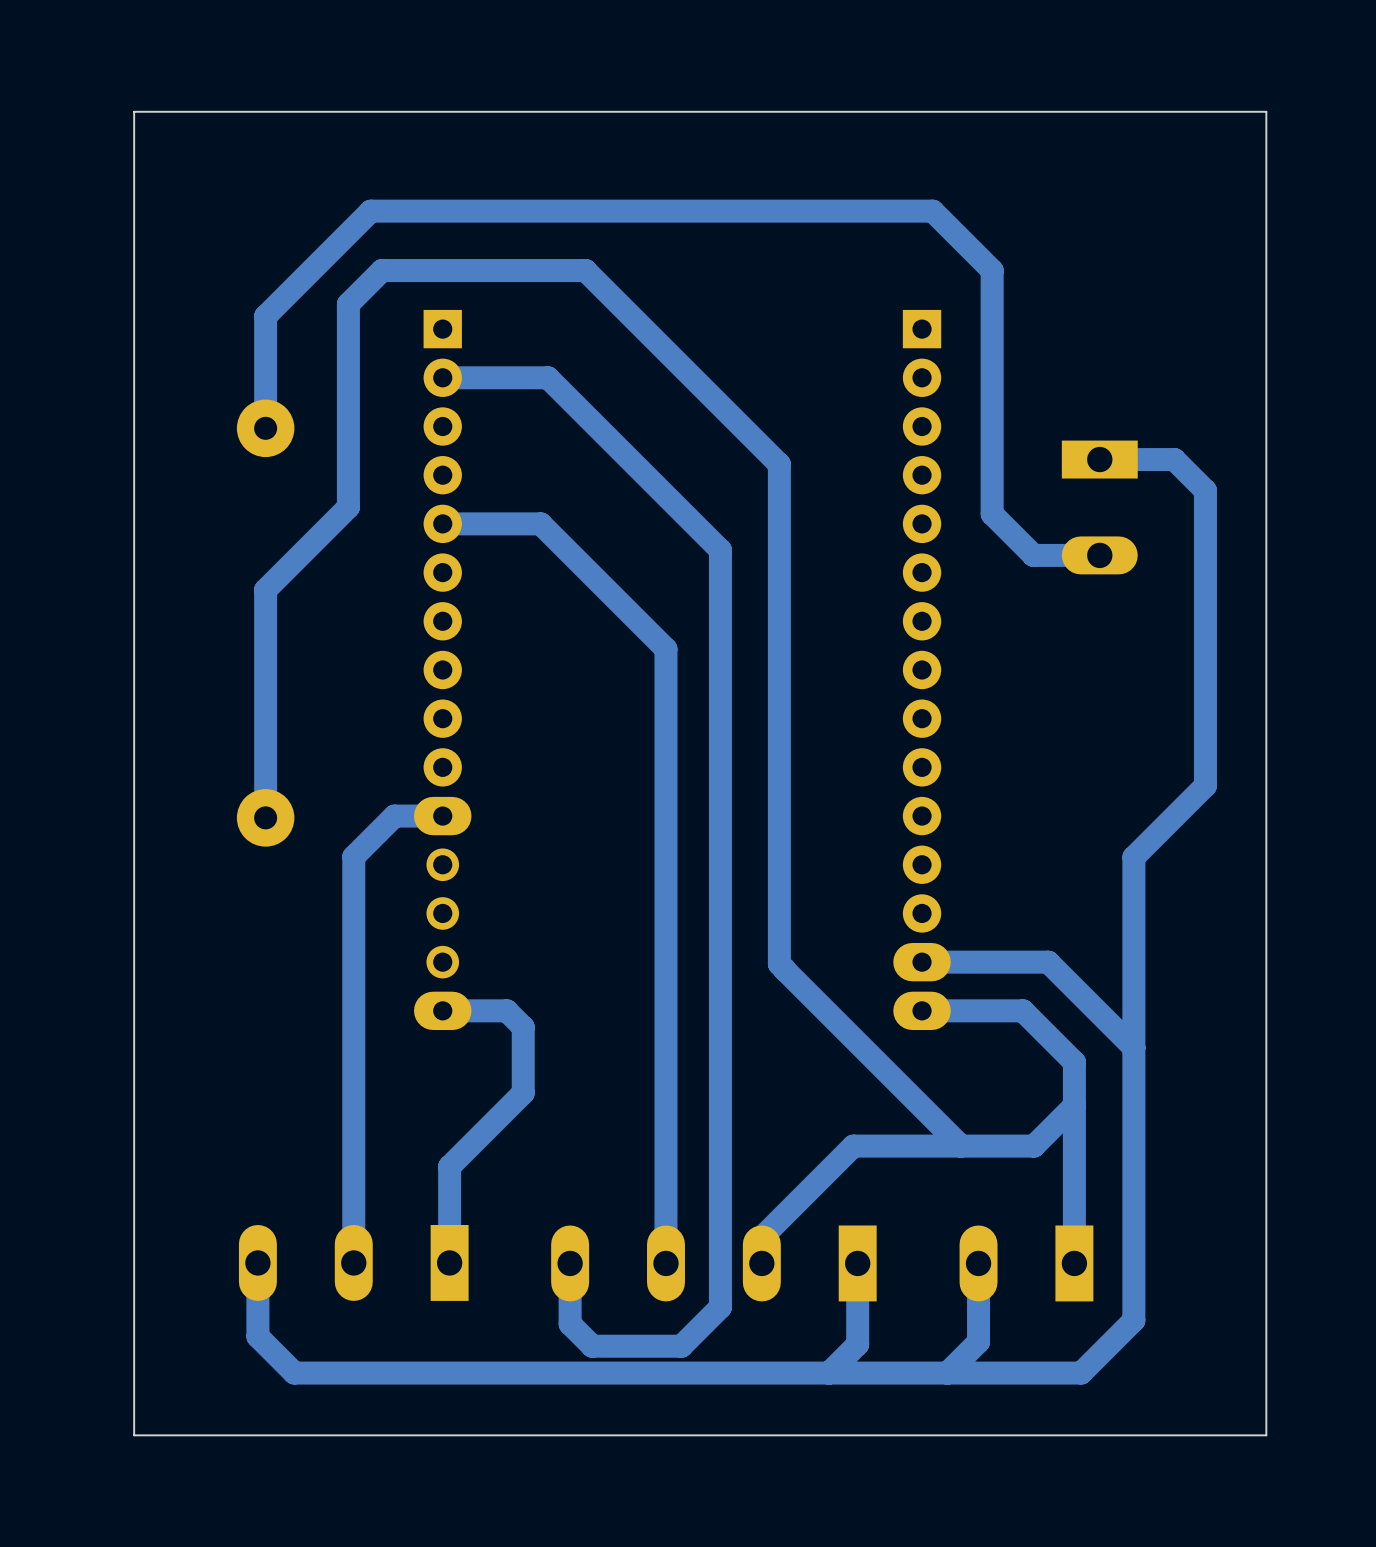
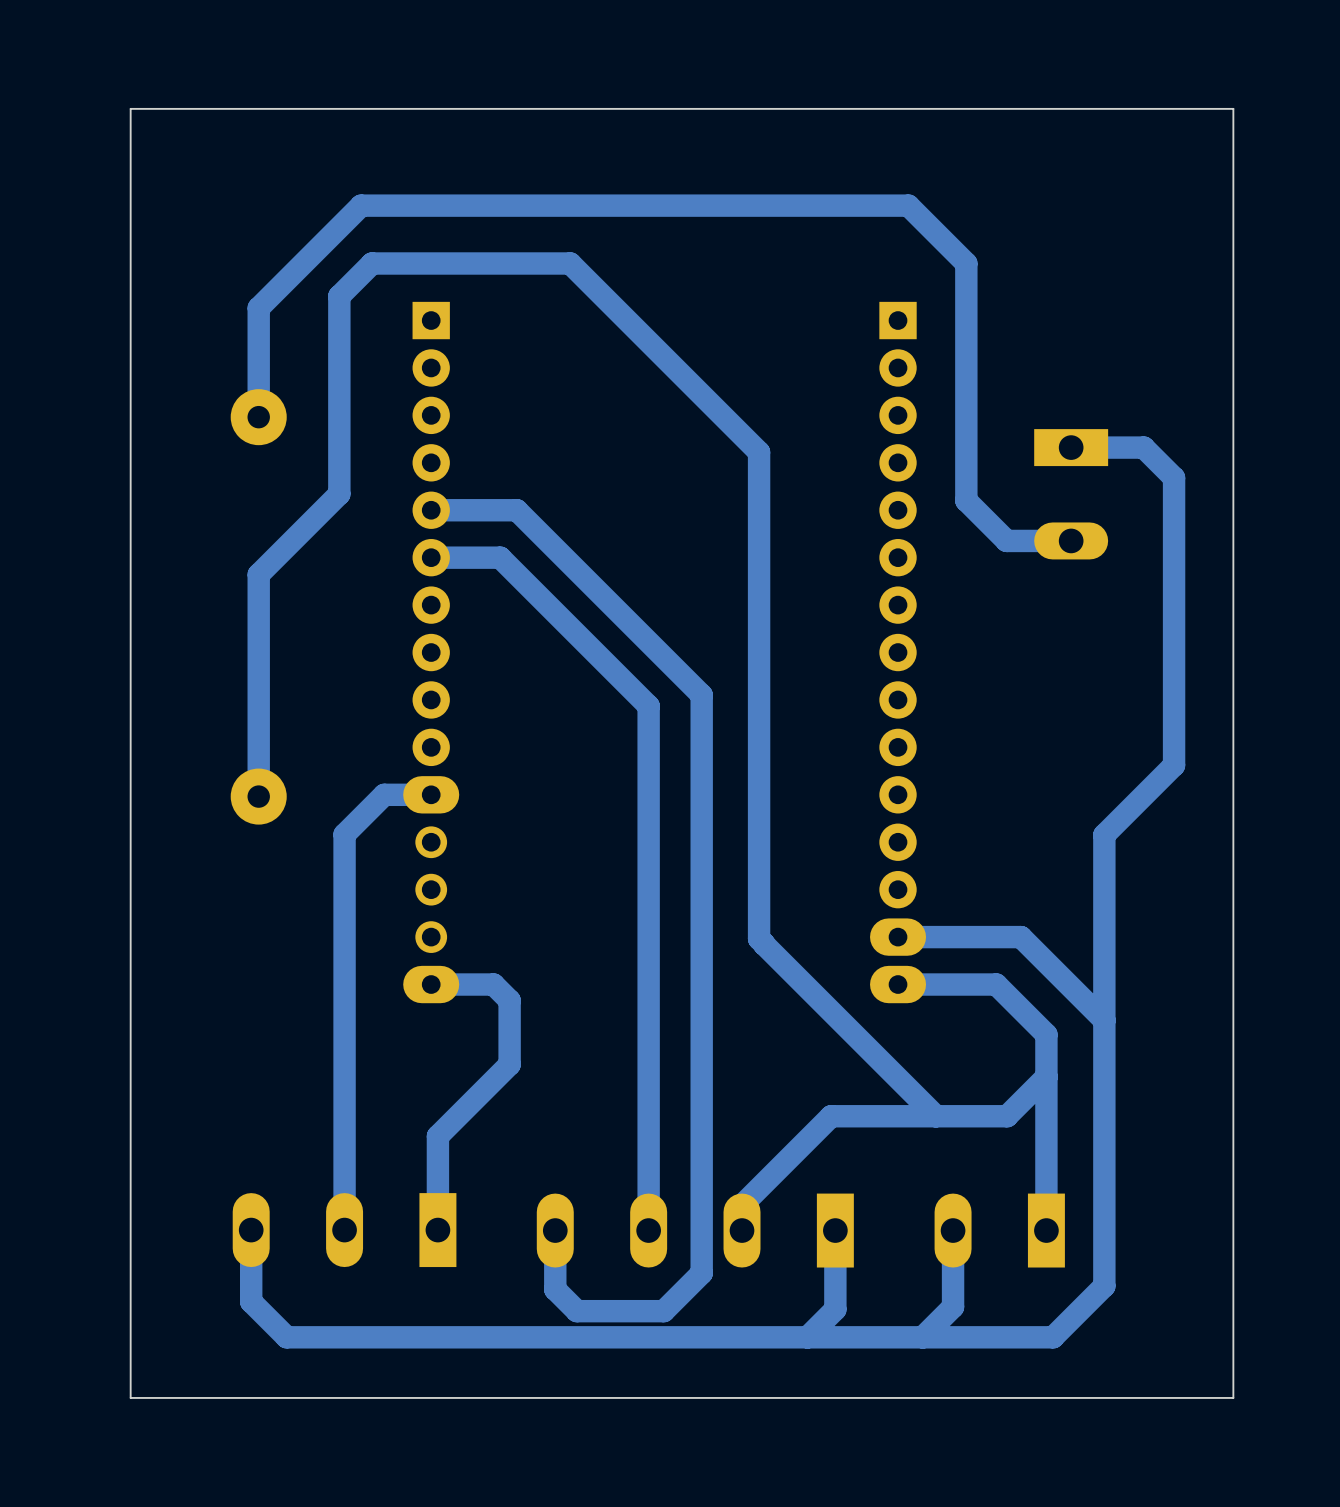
track: (442, 377) (548, 377) (720, 550) (720, 713) -> none
track: (530, 523) (540, 523) (665, 649) (665, 724) -> (516, 510) (701, 695)
track: none -> (431, 557) (500, 557) (648, 706)

